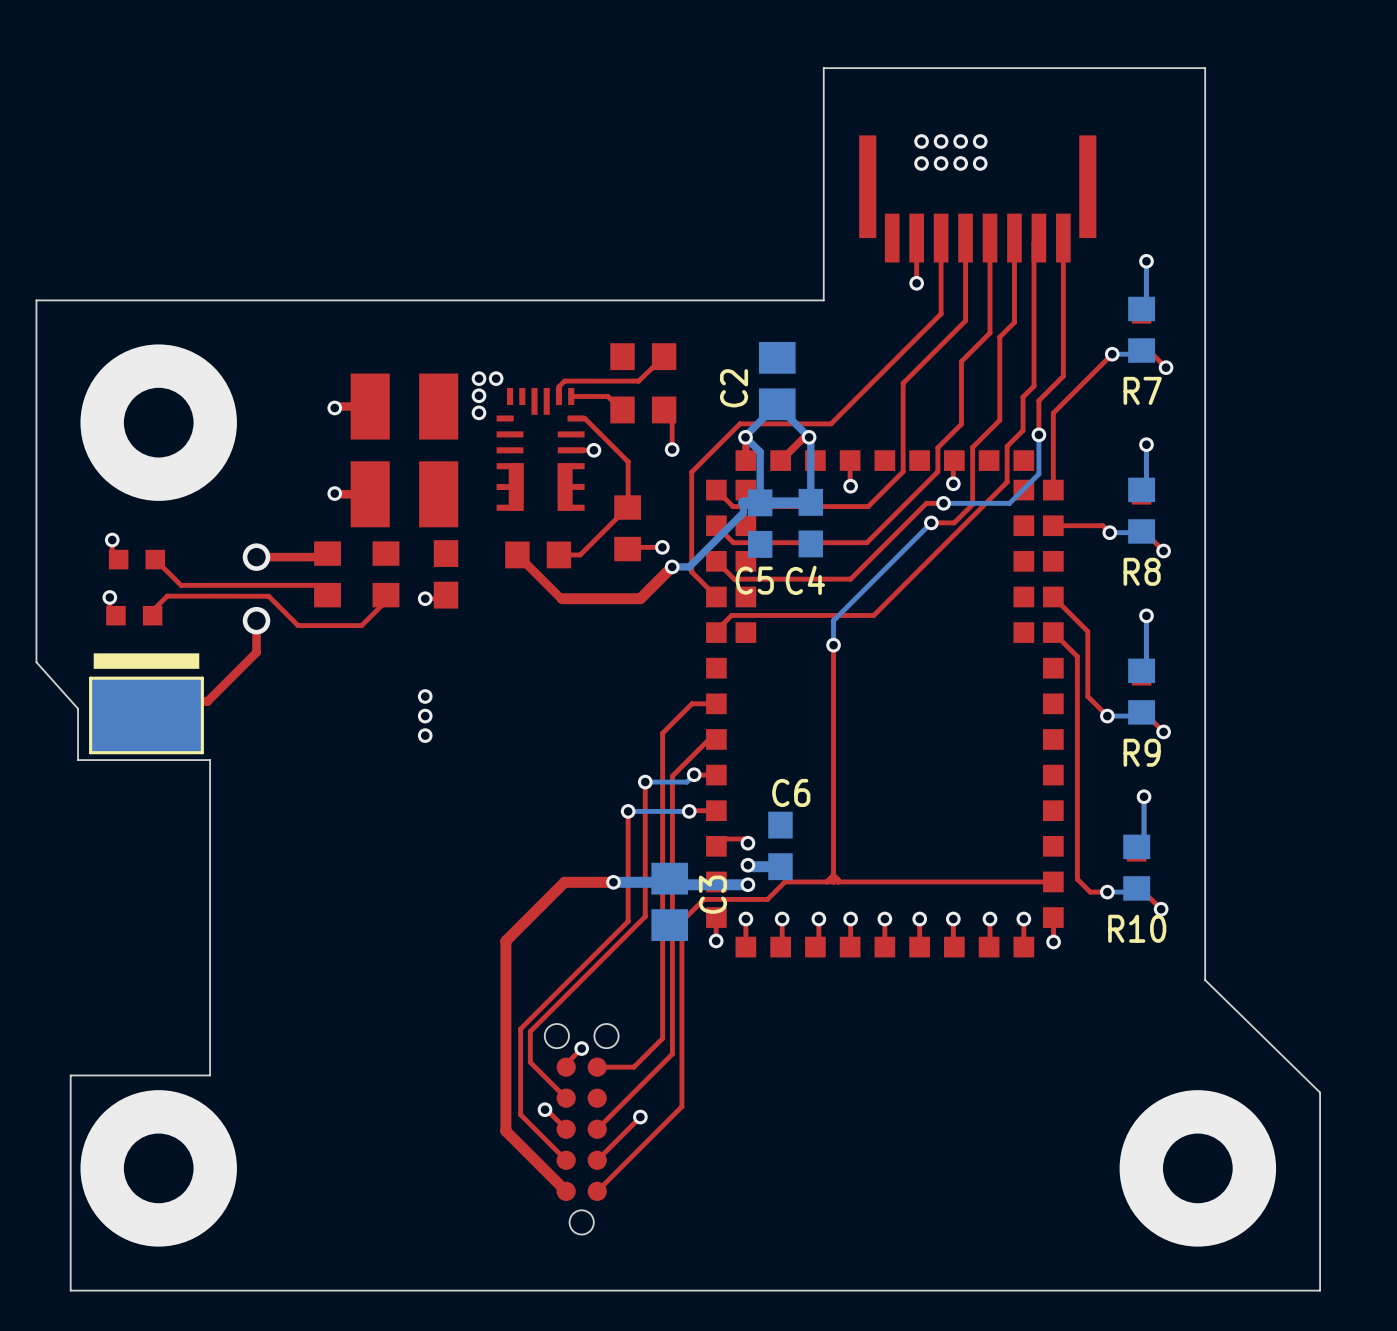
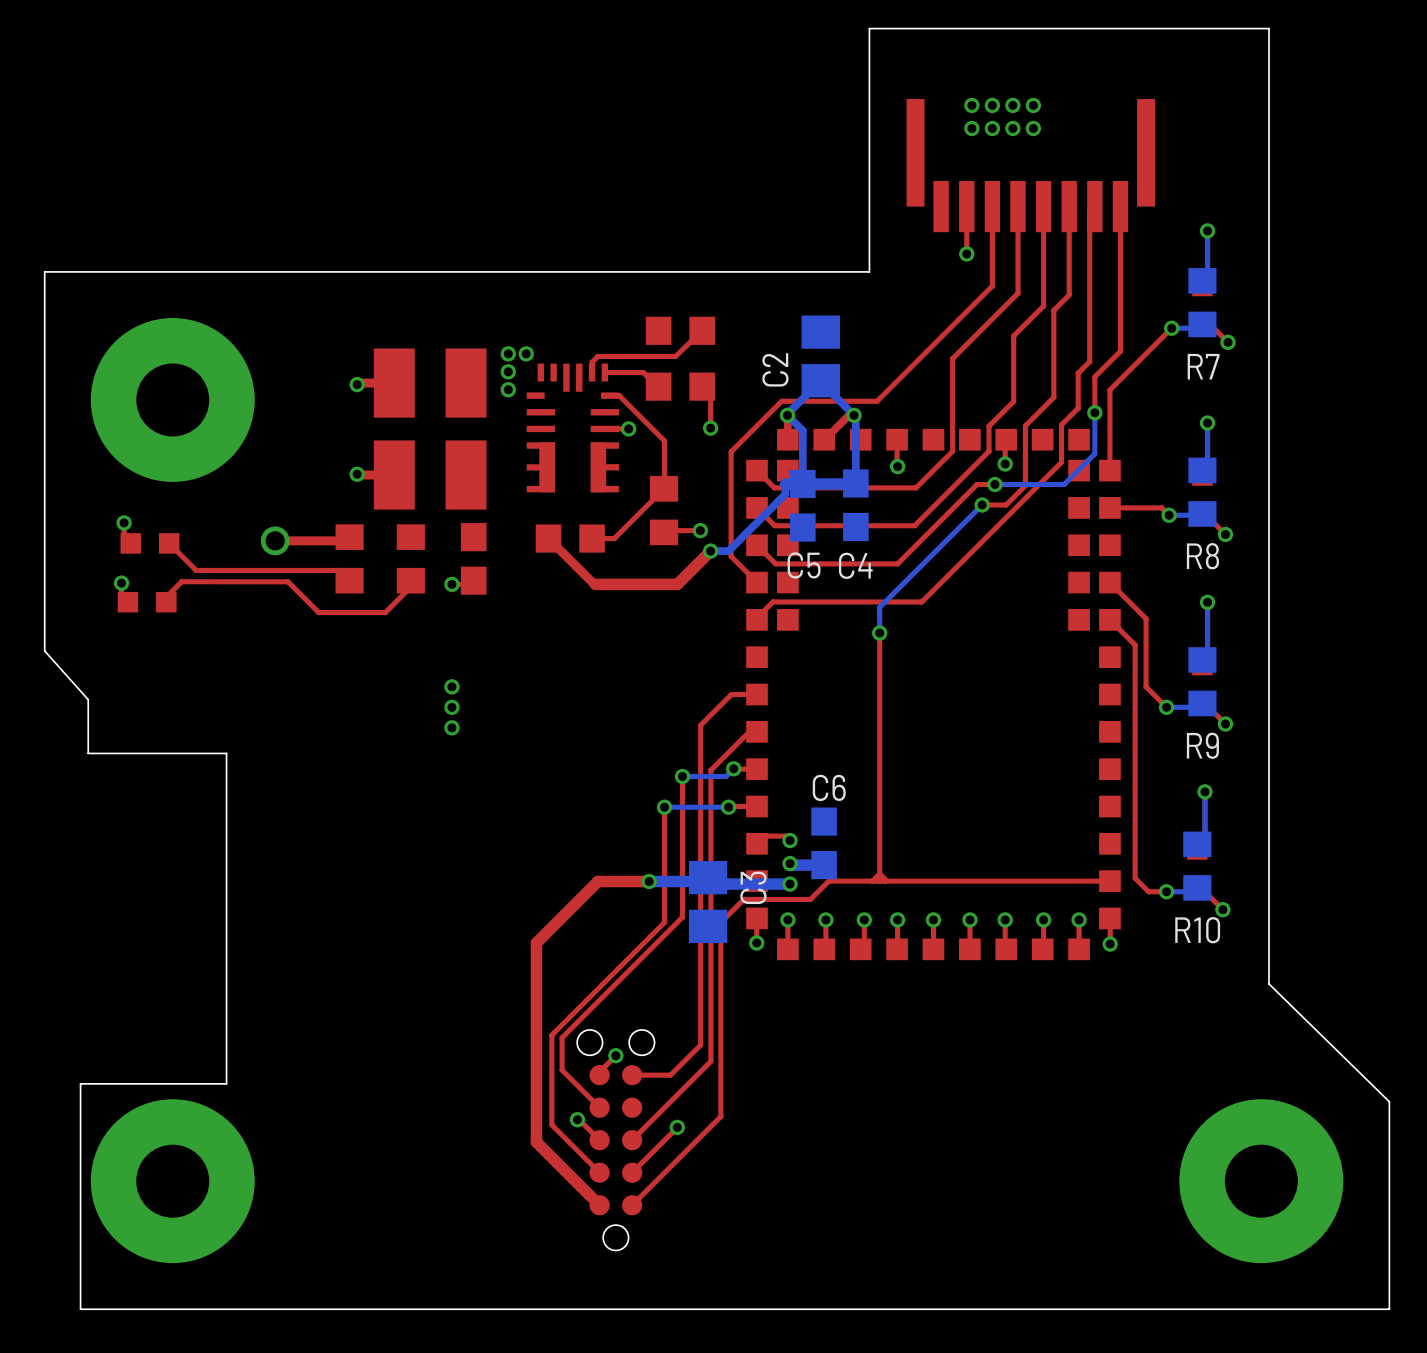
top track: (256, 620) (256, 652) (207, 701) (160, 701) (146, 715) -> none
via: (256, 620) -> none
part: (146, 703) -> none

